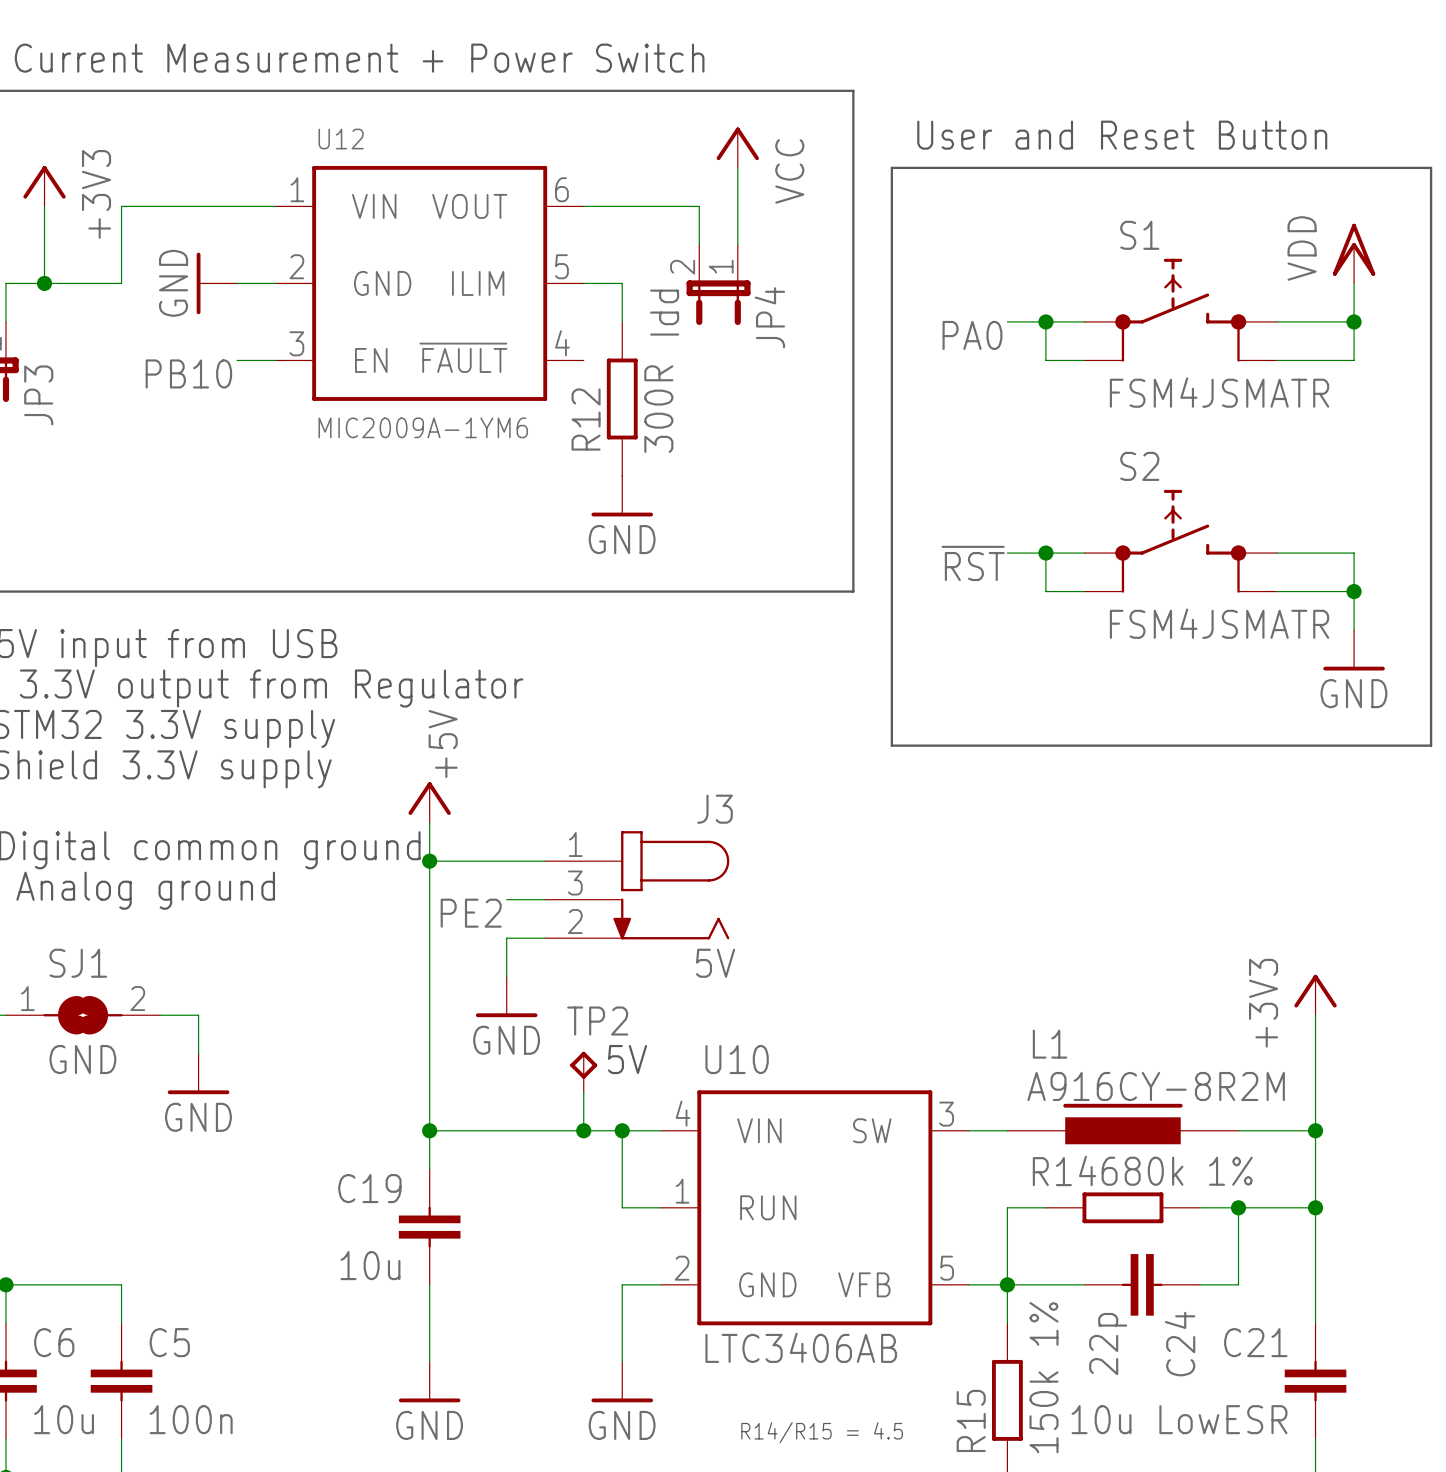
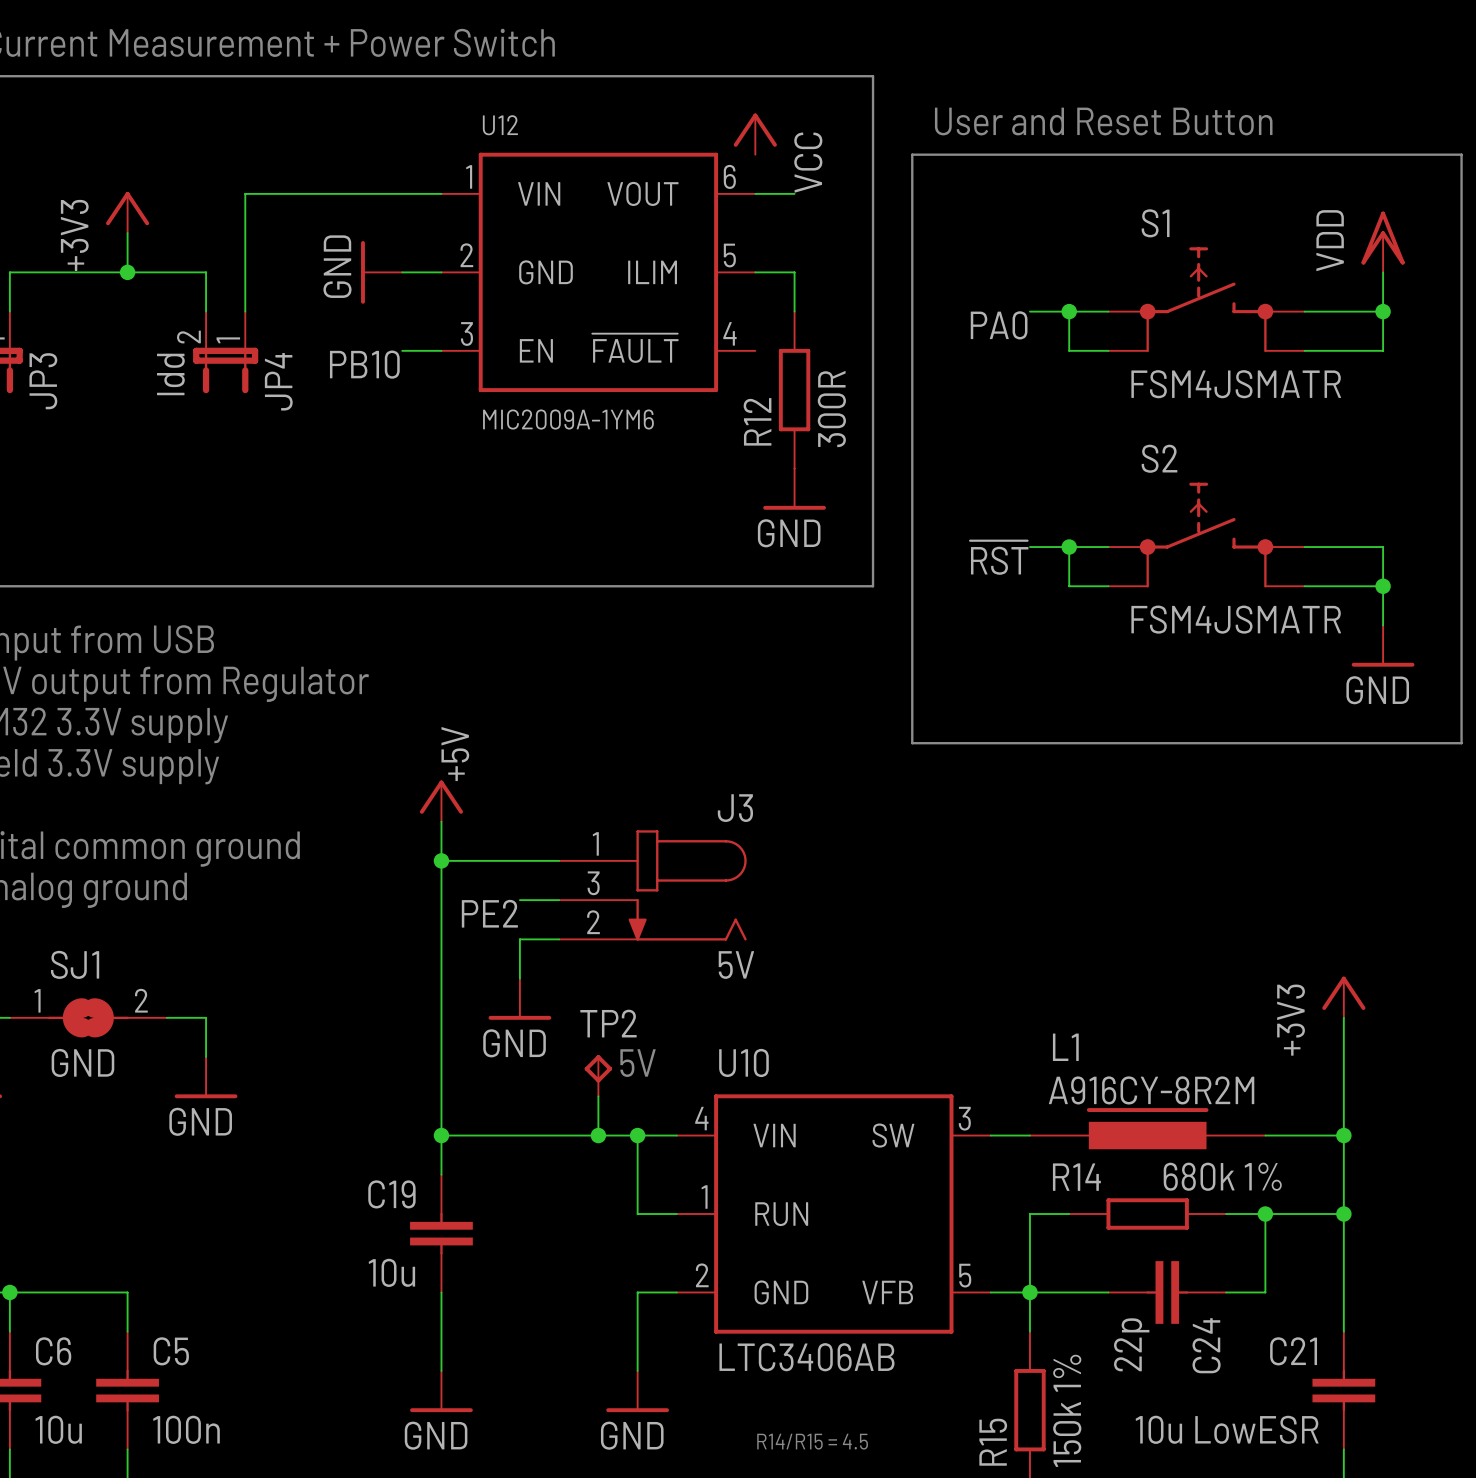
wire: (737, 167) (737, 244) -> none
power symbol position: +3V3 (44, 186) -> +3V3 (127, 212)
power symbol text position: +3V3 (96, 194) -> +3V3 (74, 235)
wire: (44, 206) (44, 283) -> none
wire: (237, 206) (121, 206) (121, 244) -> (245, 193) (245, 311)
wire: none -> (284, 193) (441, 193)
wire: (583, 206) (699, 206) (699, 244) -> none
wire: none -> (755, 193) (794, 193)
junction position: (44, 283) -> (127, 272)
wire: none -> (127, 272) (206, 272) (206, 311)
power symbol position: GND (216, 283) -> GND (381, 272)
wire: (237, 283) (275, 283) -> (402, 272) (441, 272)
U12 position: (429, 283) -> (598, 272)
wire: (583, 283) (622, 283) (622, 321) -> (755, 272) (794, 272) (794, 311)
JP4 position: (718, 284) -> (225, 352)
wire: (237, 360) (275, 360) -> (402, 350) (441, 350)
label position: PB10 (188, 373) -> PB10 (364, 364)
R12 position: (622, 398) -> (794, 390)
power symbol position: GND (622, 496) -> GND (794, 489)

